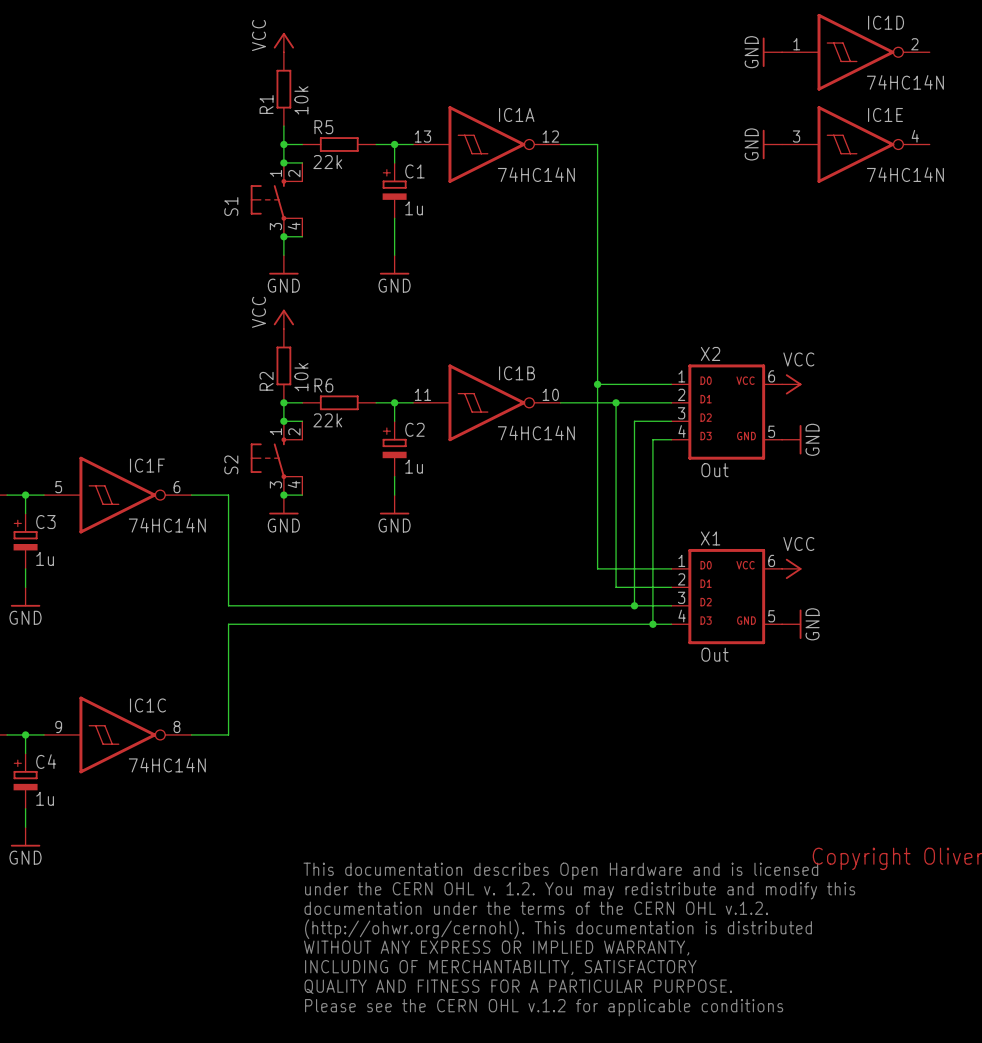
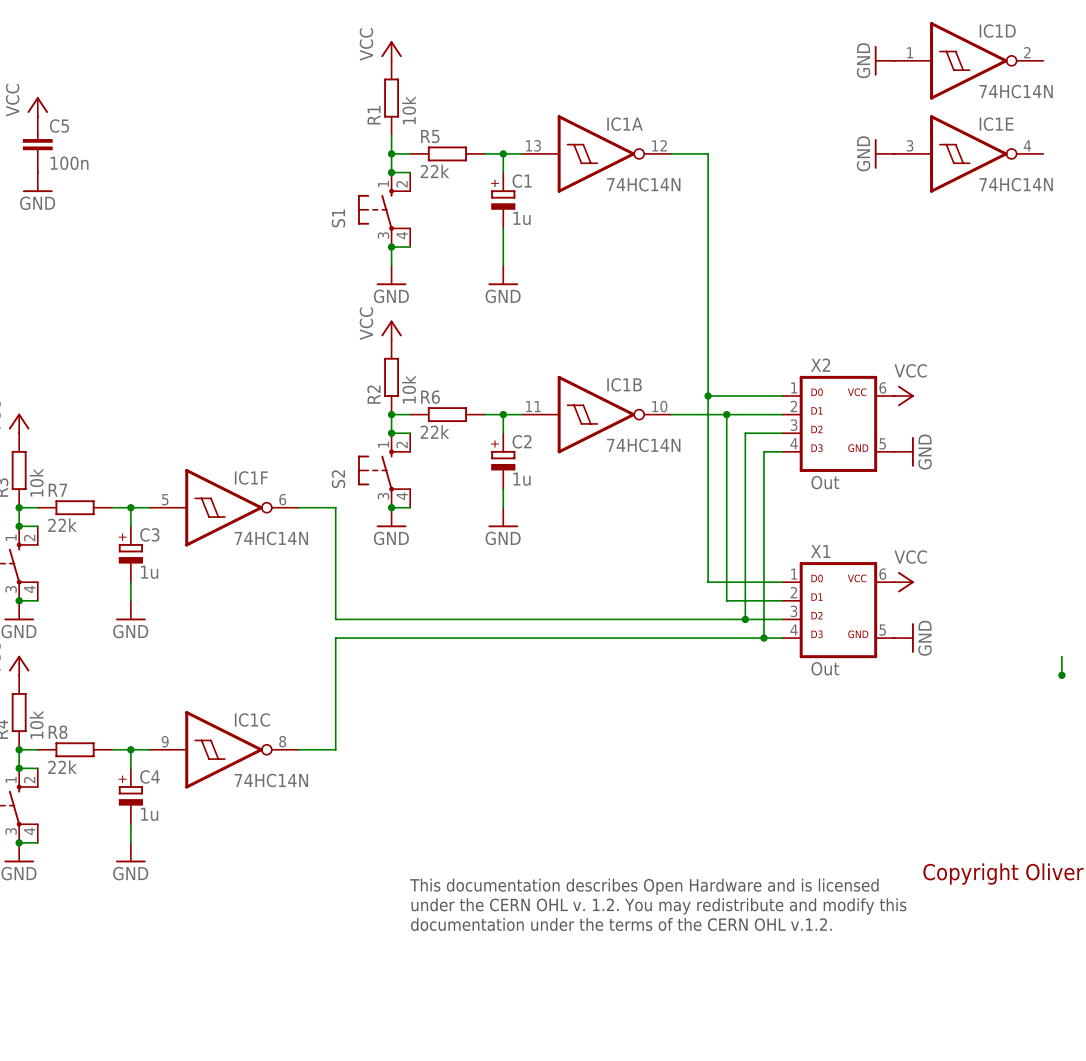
wire: none -> (1061, 656) (1061, 675)
junction: none -> (1061, 675)
text: (http://ohwr.org/cernohl). This documentation is distributed (558, 929) -> none
text: WITHOUT ANY EXPRESS OR IMPLIED WARRANTY, (496, 948) -> none
text: INCLUDING OF MERCHANTABILITY, SATISFACTORY (500, 967) -> none
text: QUALITY AND FITNESS FOR A PARTICULAR PURPOSE. (518, 986) -> none
text: Please see the CERN OHL v.1.2 for applicable conditions (544, 1007) -> none

